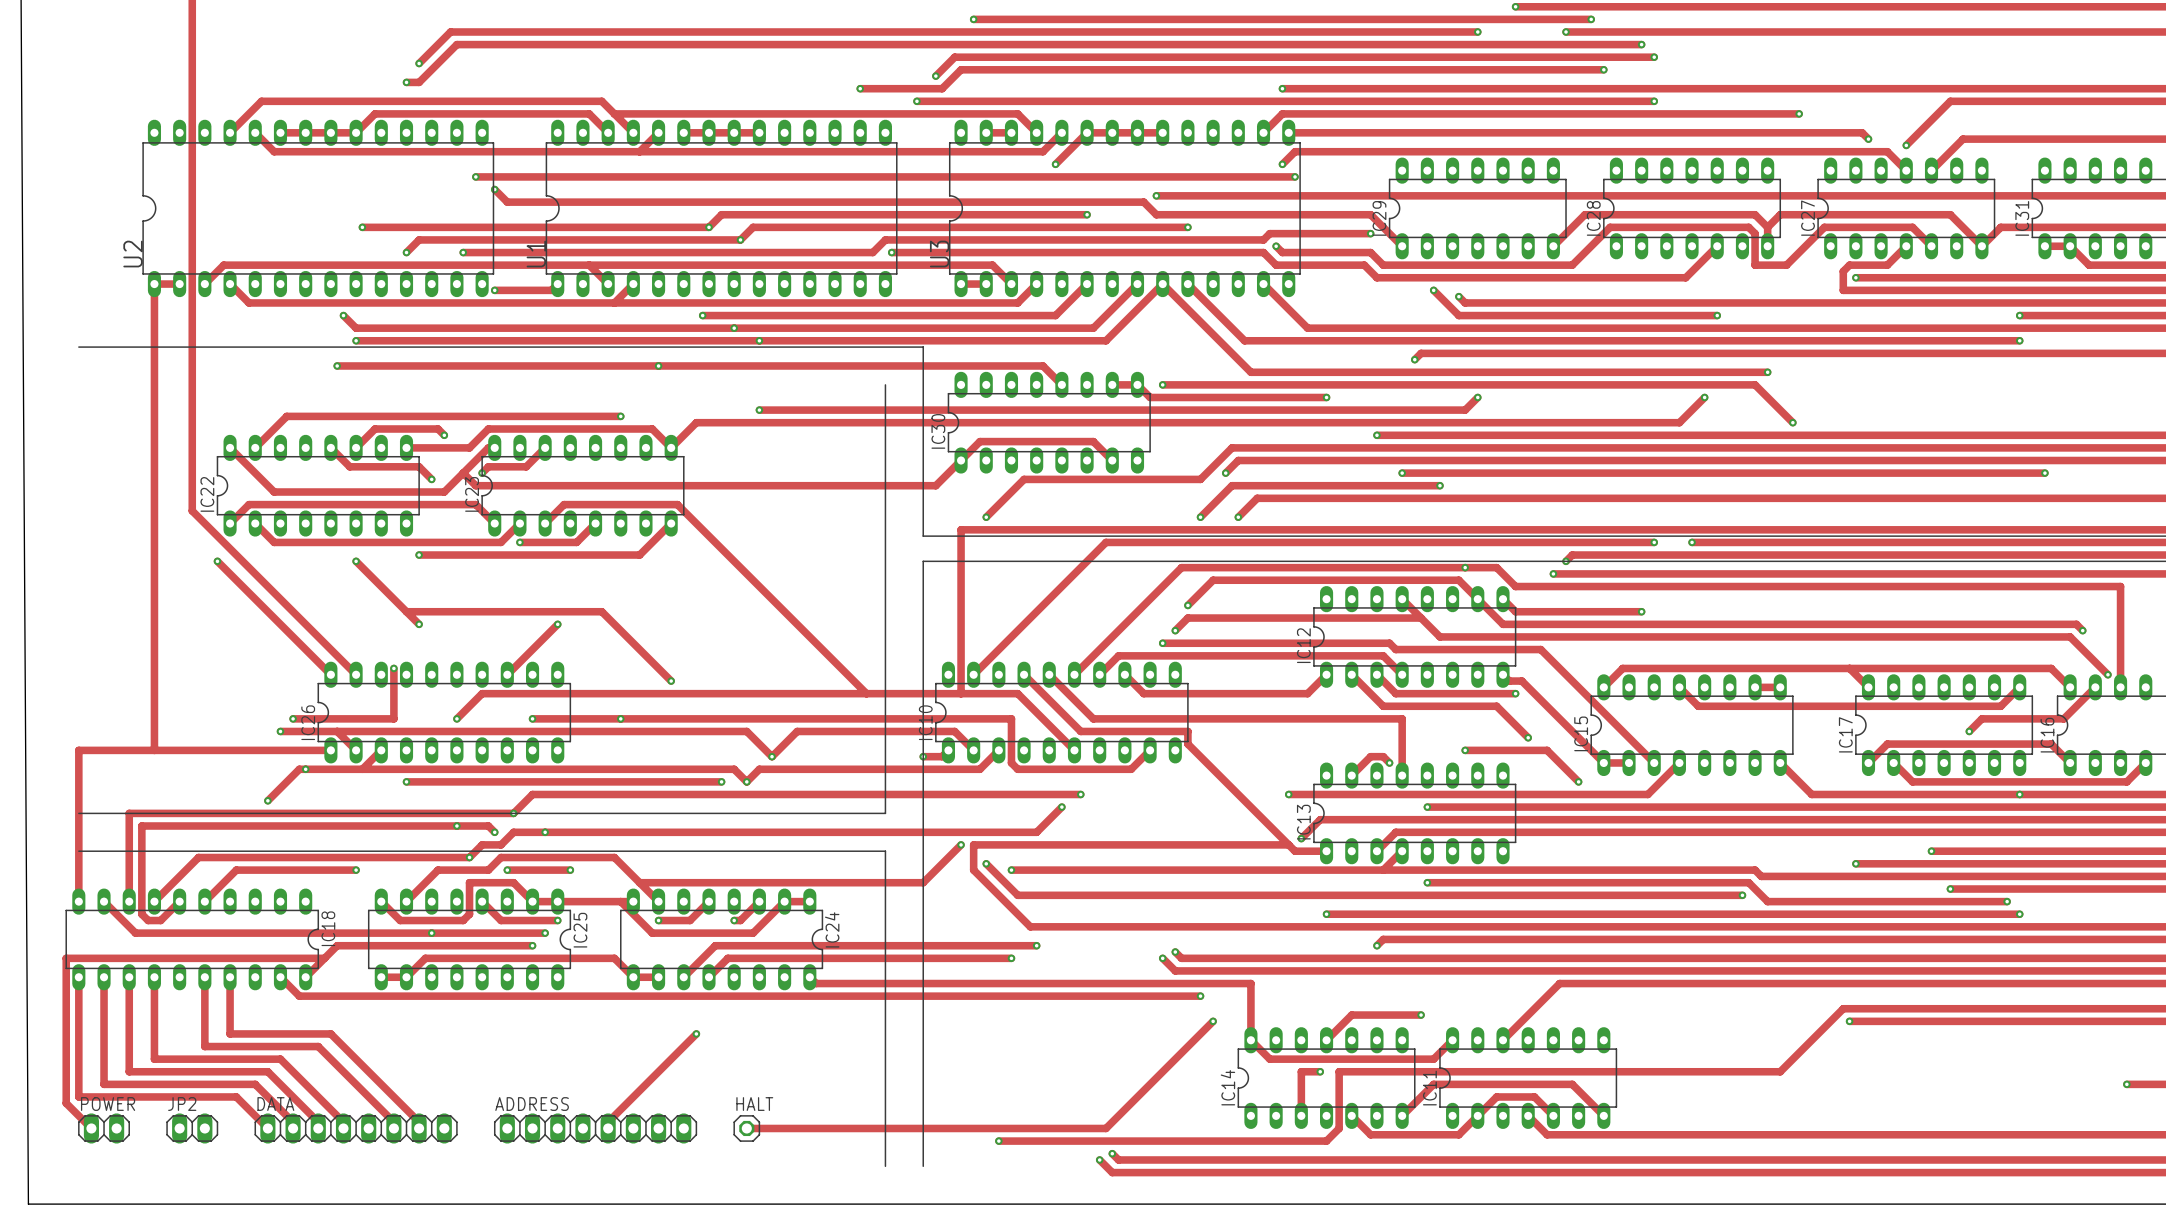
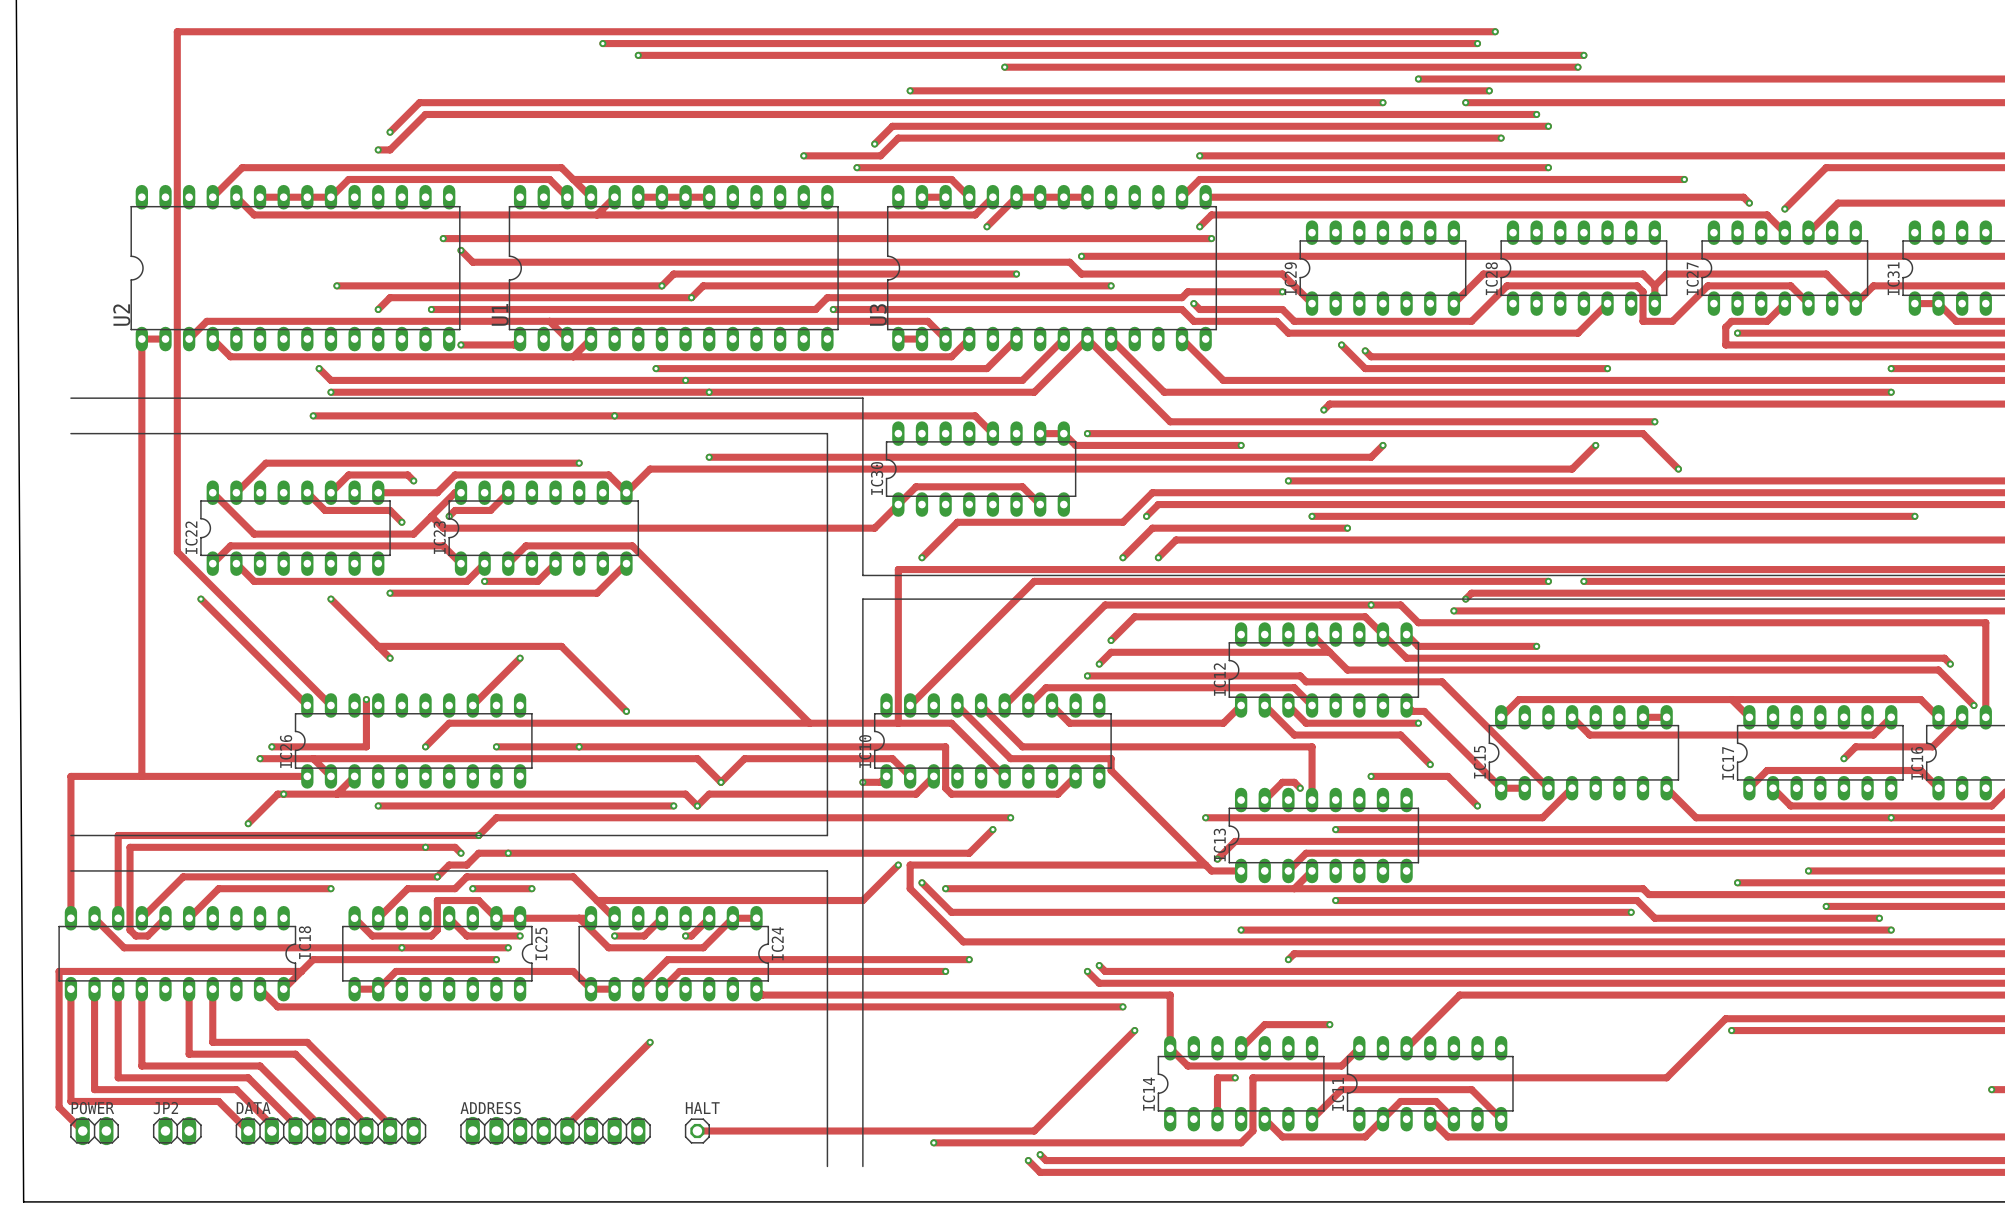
line: none -> (70, 433) (827, 433)

